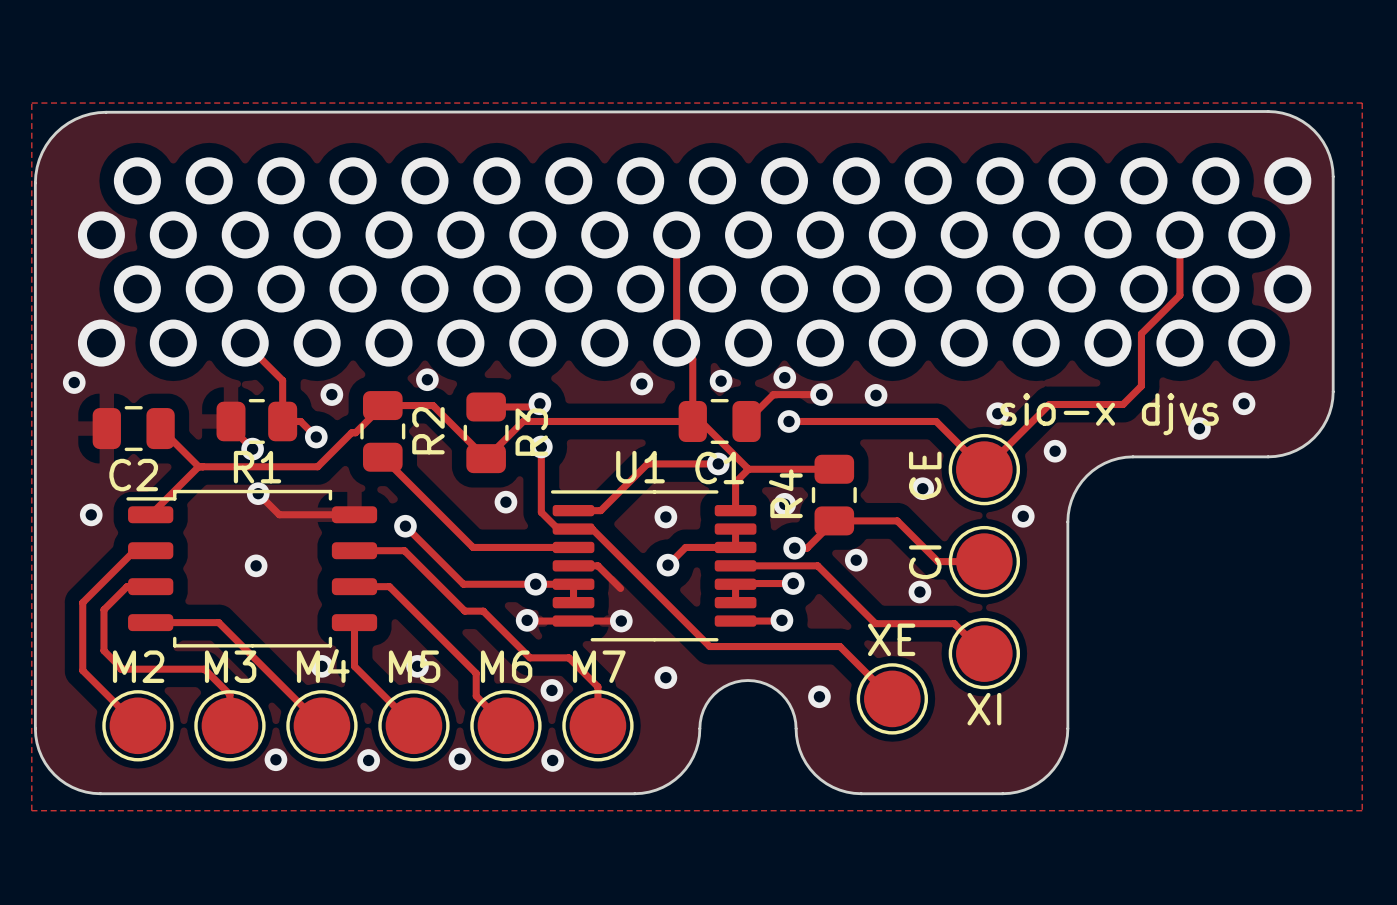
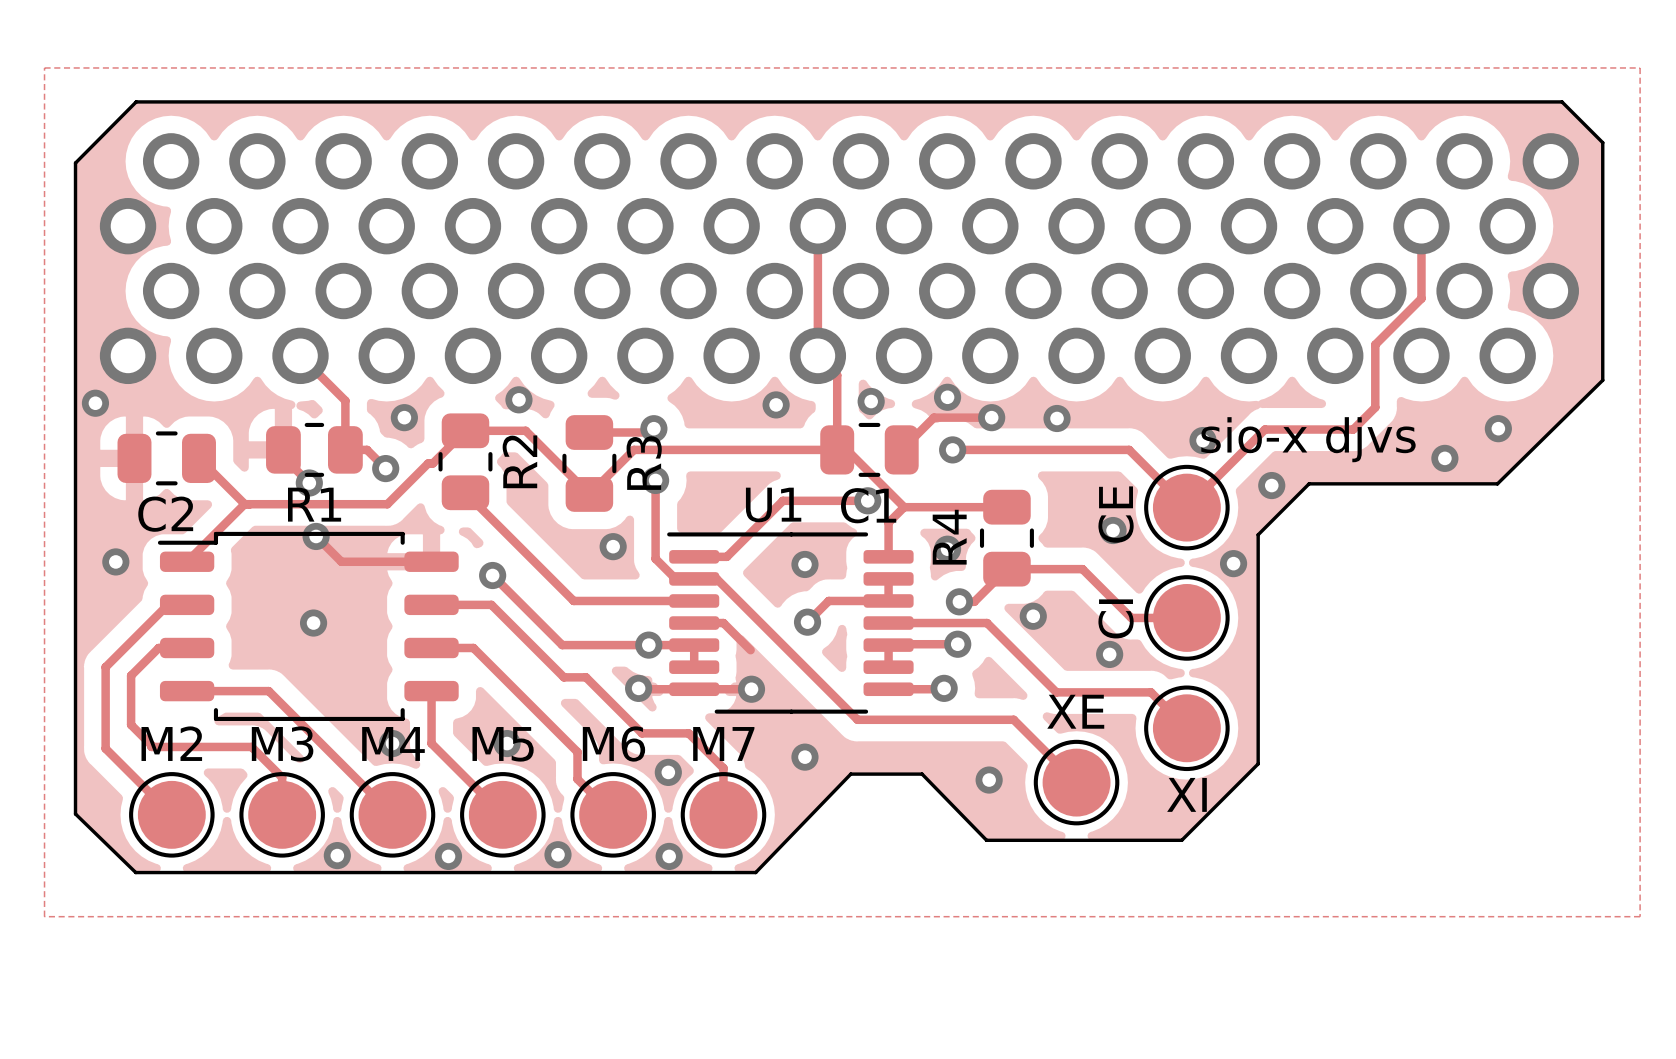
board edge: (1268, 111) (106, 112) (90, 114) (75, 119) (62, 127) (46, 145) (39, 159) (35, 183) (35, 728) (37, 743) (41, 756) (49, 769) (59, 779) (78, 790) (93, 793) (642, 793) (662, 787) (680, 774) (689, 763) (696, 750) (701, 716) (709, 699) (718, 690) (729, 684) (747, 680) (766, 684) (777, 690) (786, 699) (794, 716) (797, 743) (806, 763) (820, 779) (839, 790) (861, 793) (1002, 793) (1017, 792) (1030, 787) (1043, 779) (1053, 769) (1064, 750) (1067, 735) (1068, 514) (1074, 493) (1082, 481) (1092, 471) (1104, 463) (1125, 457) (1282, 455) (1296, 450) (1308, 442) (1323, 426) (1329, 413) (1333, 391) (1333, 176) (1331, 162) (1323, 141) (1308, 125) (1289, 115) (1268, 111) -> (136, 101) (75, 163) (75, 813) (135, 872) (755, 872) (850, 774) (922, 774) (986, 840) (1181, 840) (1258, 763) (1258, 534) (1309, 483) (1497, 483) (1602, 380) (1602, 142) (1562, 101) (136, 101)

